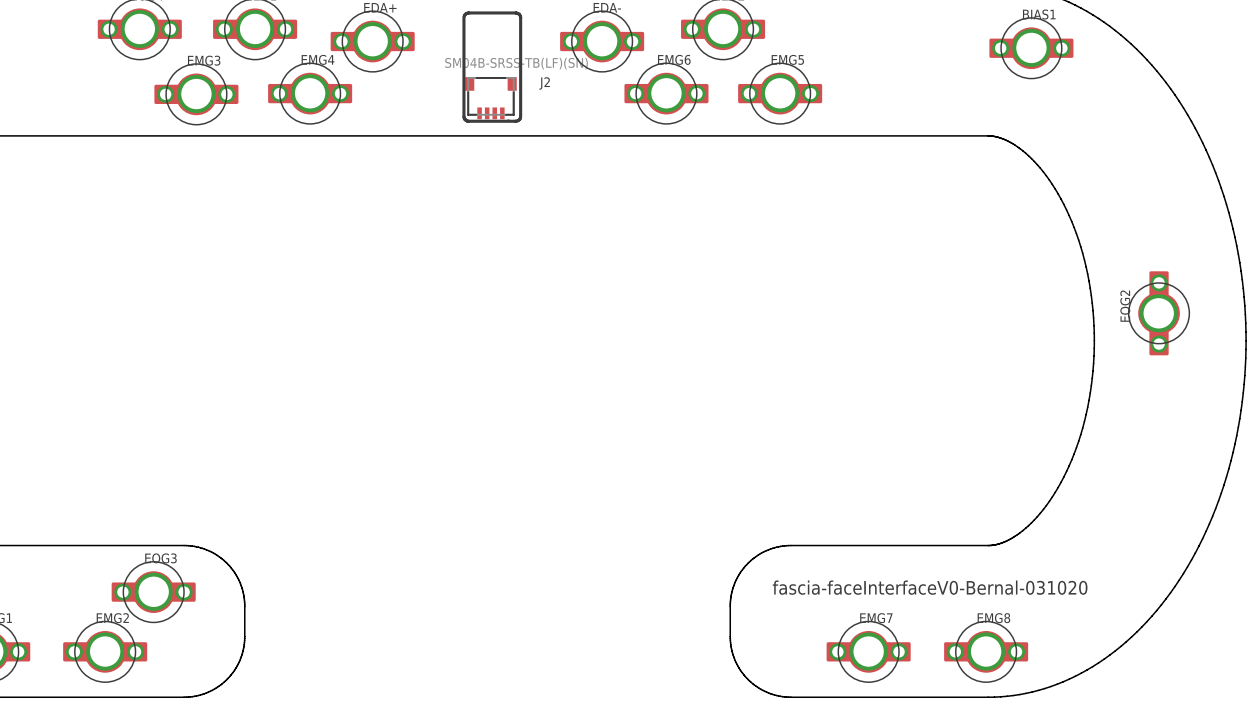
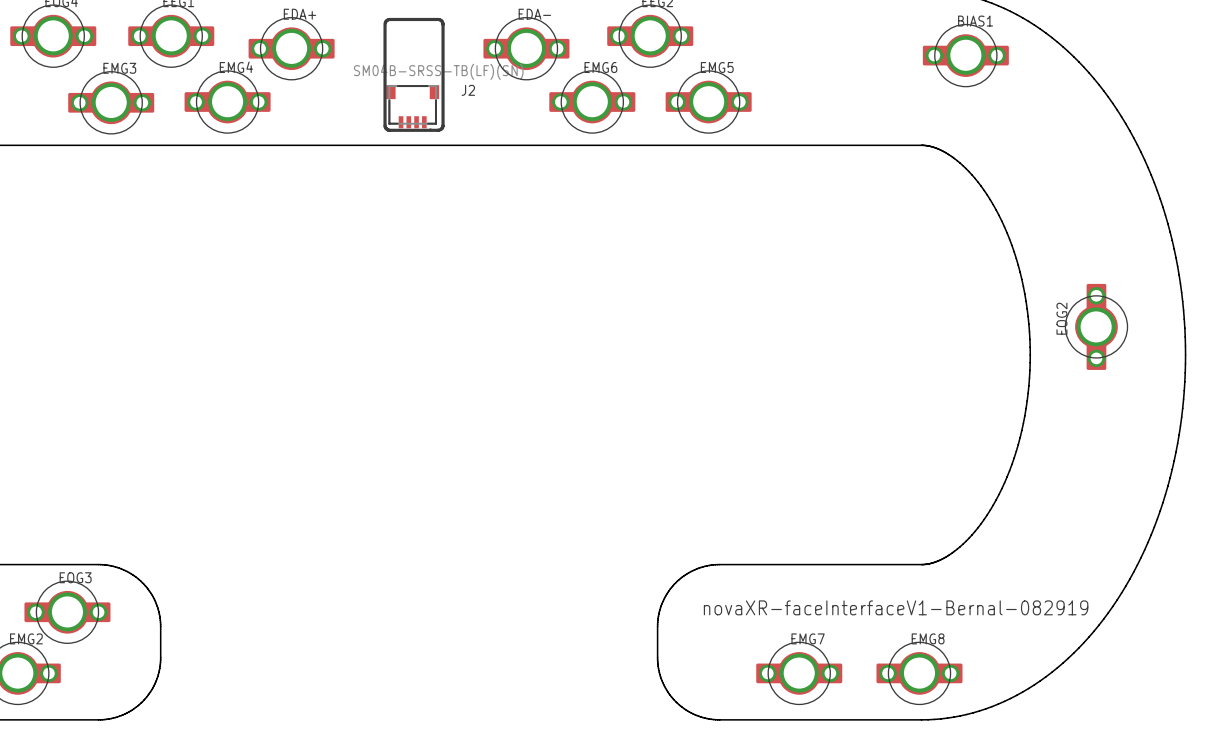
text: fascia-faceInterfaceV0-Bernal-031020 (930, 587) -> novaXR-faceInterfaceV1-Bernal-082919 (896, 607)

